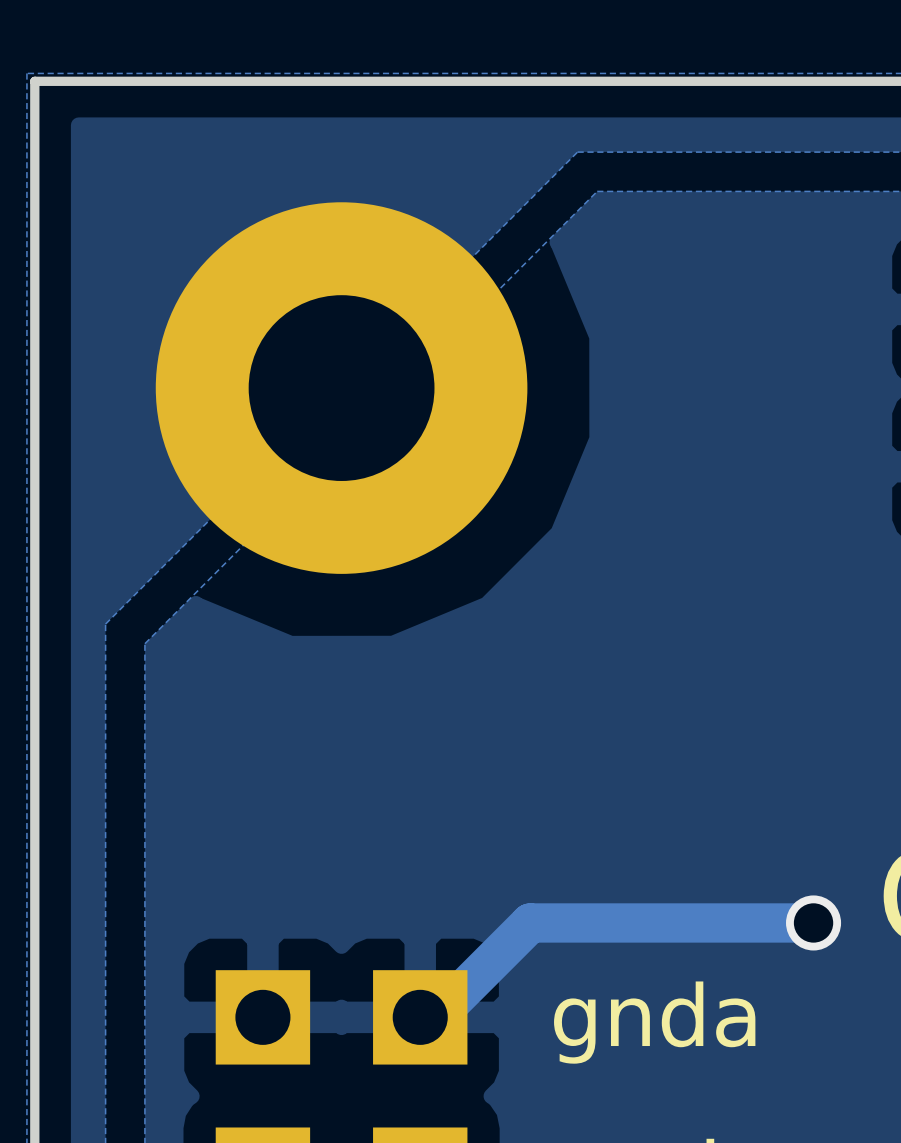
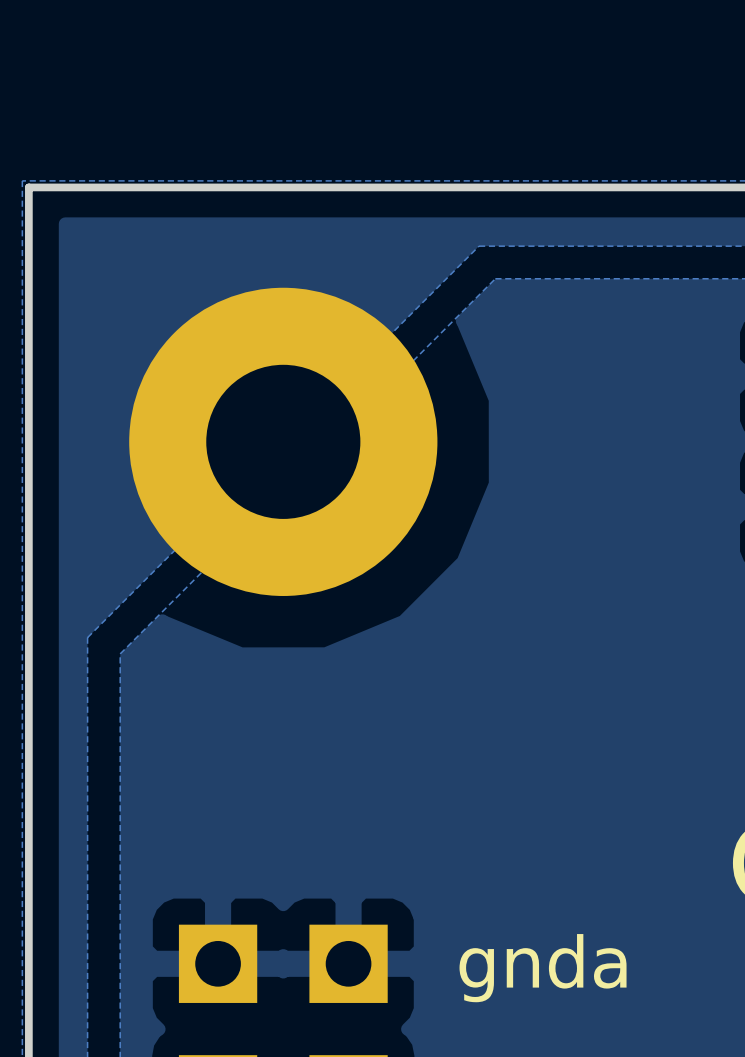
track: (813, 922) (530, 922) (435, 1017) (420, 1017) -> none
via: (813, 922) -> none

